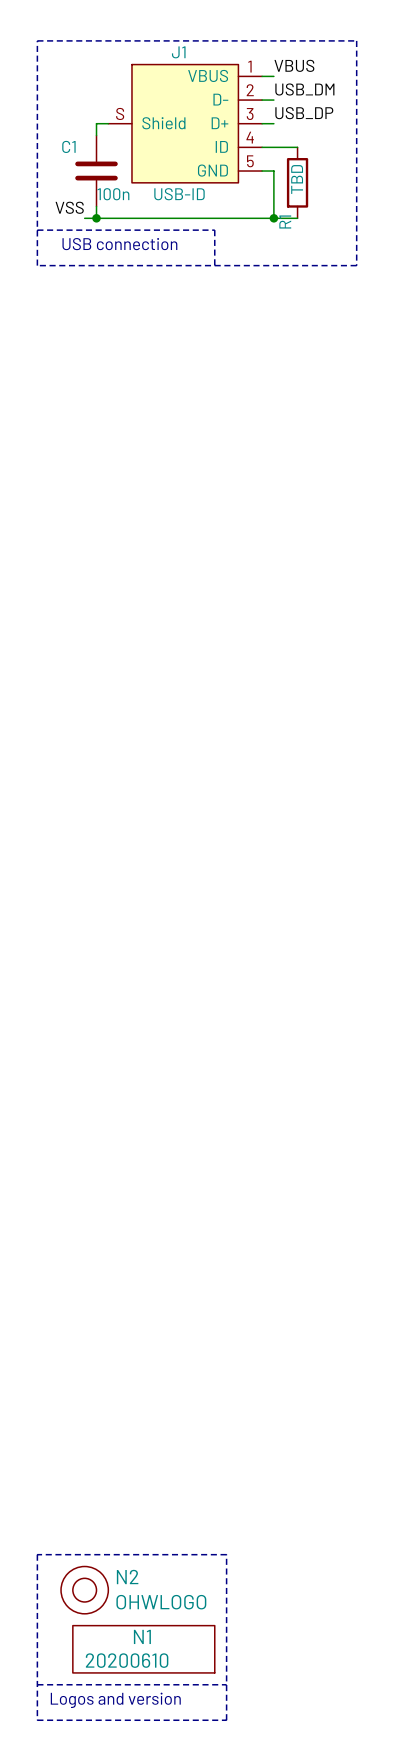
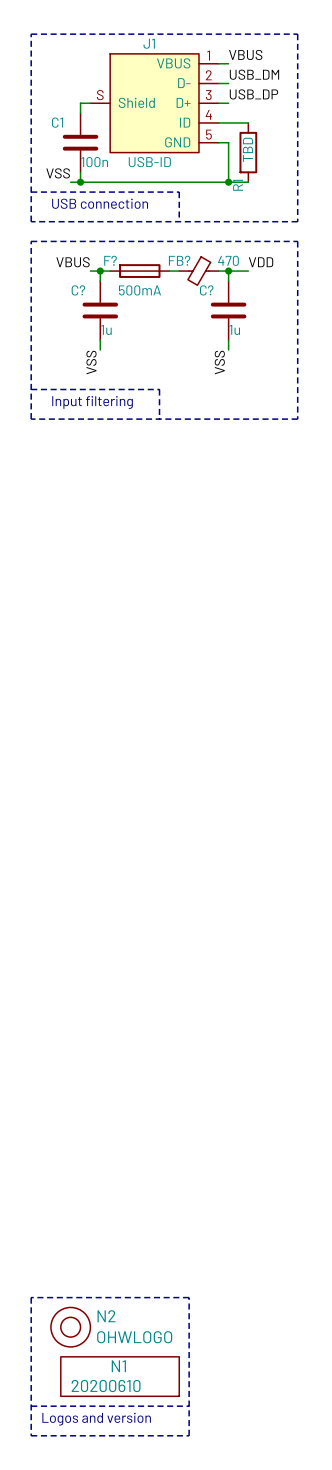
line: none -> (31, 241) (297, 241) (297, 419) (31, 419) (31, 241)
label: none -> VBUS (73, 262)
label: none -> VDD (261, 262)
wire: none -> (90, 271) (110, 271)
wire: none -> (100, 271) (100, 280)
junction: none -> (100, 271)
F?: none -> 500mA (139, 271)
wire: none -> (169, 271) (179, 271)
FB?: none -> 470 (198, 271)
wire: none -> (218, 271) (248, 271)
wire: none -> (228, 271) (228, 280)
junction: none -> (228, 271)
C?: none -> 1u (100, 310)
C?: none -> 1u (228, 310)
wire: none -> (100, 340) (100, 350)
wire: none -> (228, 340) (228, 350)
label: none -> VSS (91, 362)
label: none -> VSS (219, 362)
line: none -> (31, 389) (159, 389) (159, 419)
text: none -> Input filtering (92, 402)

